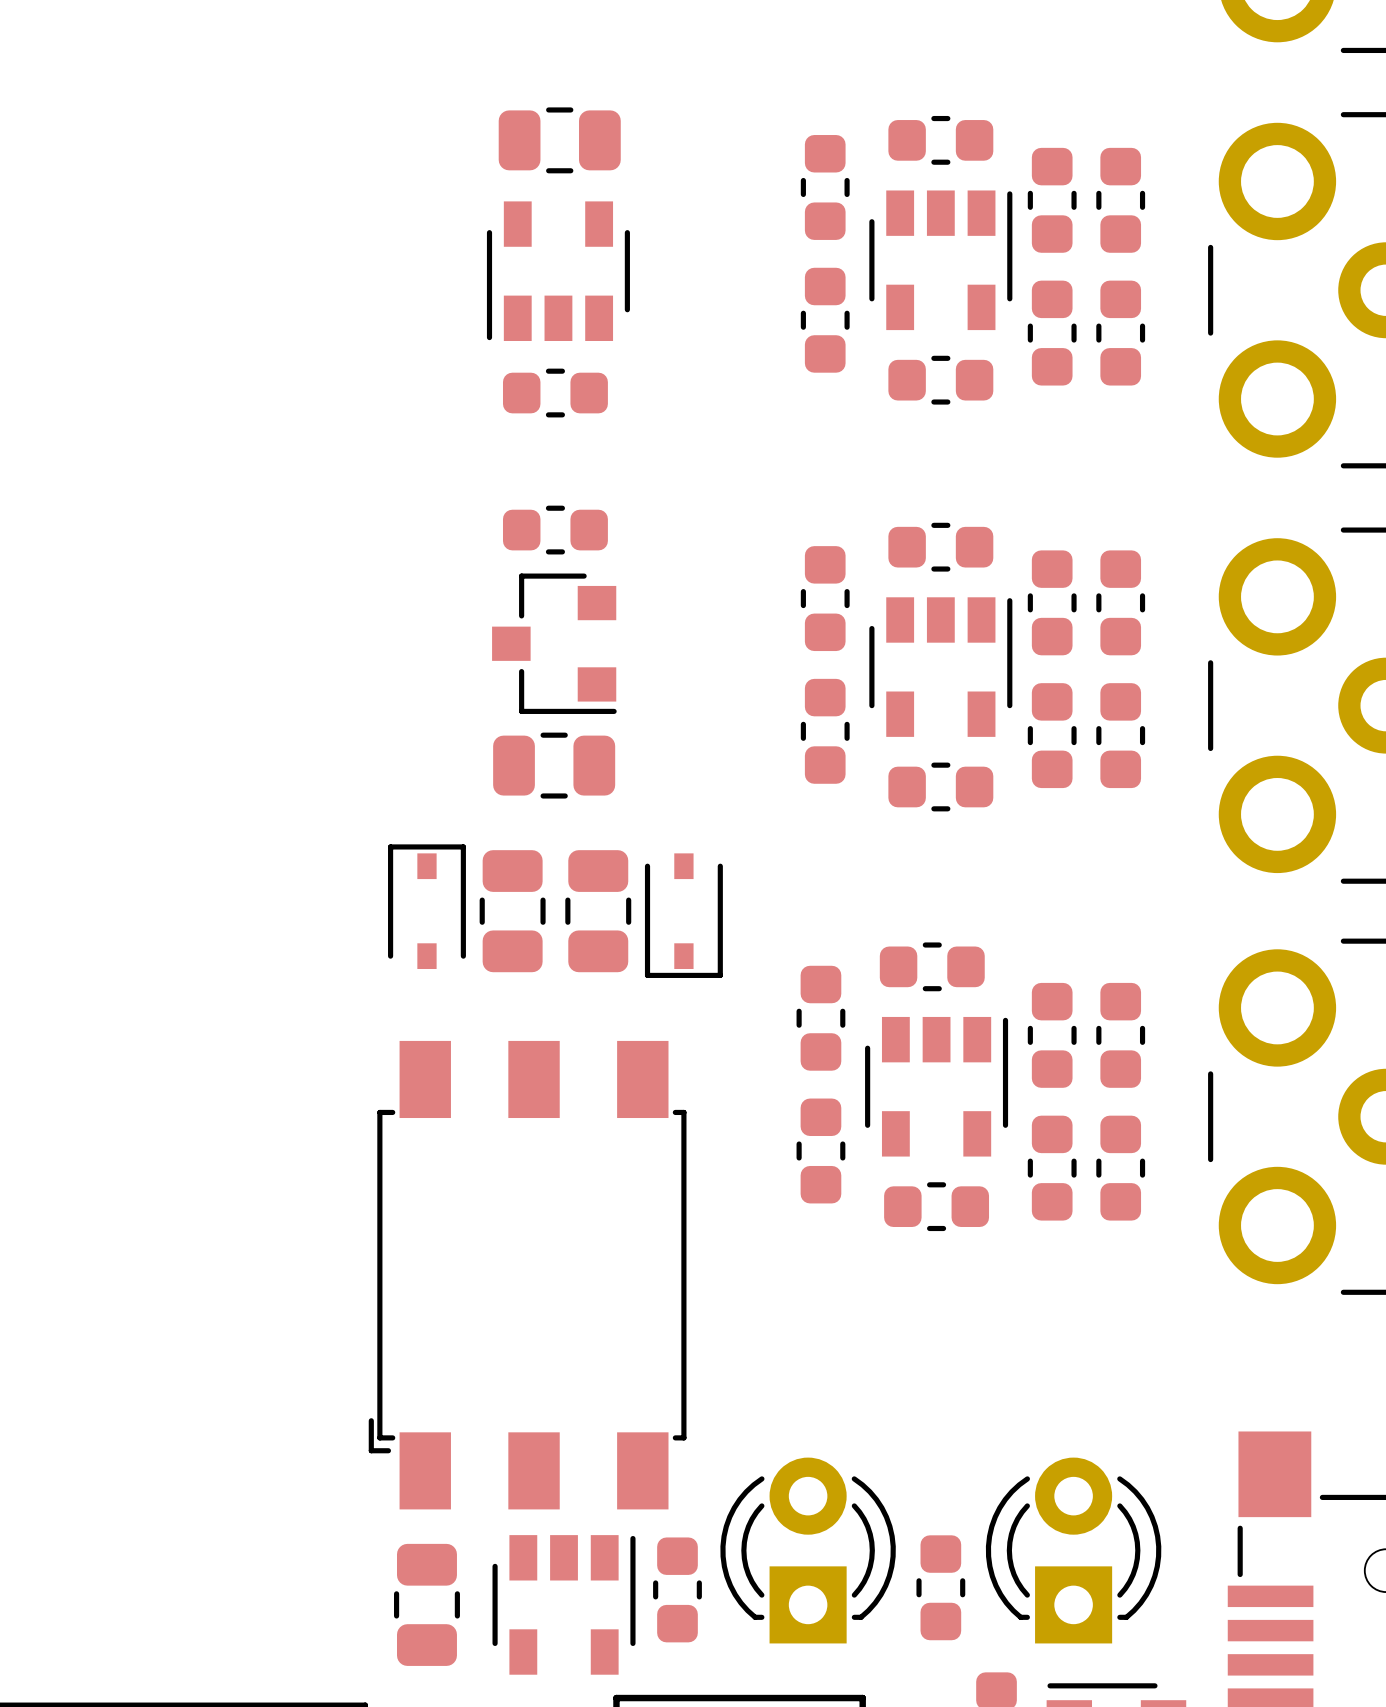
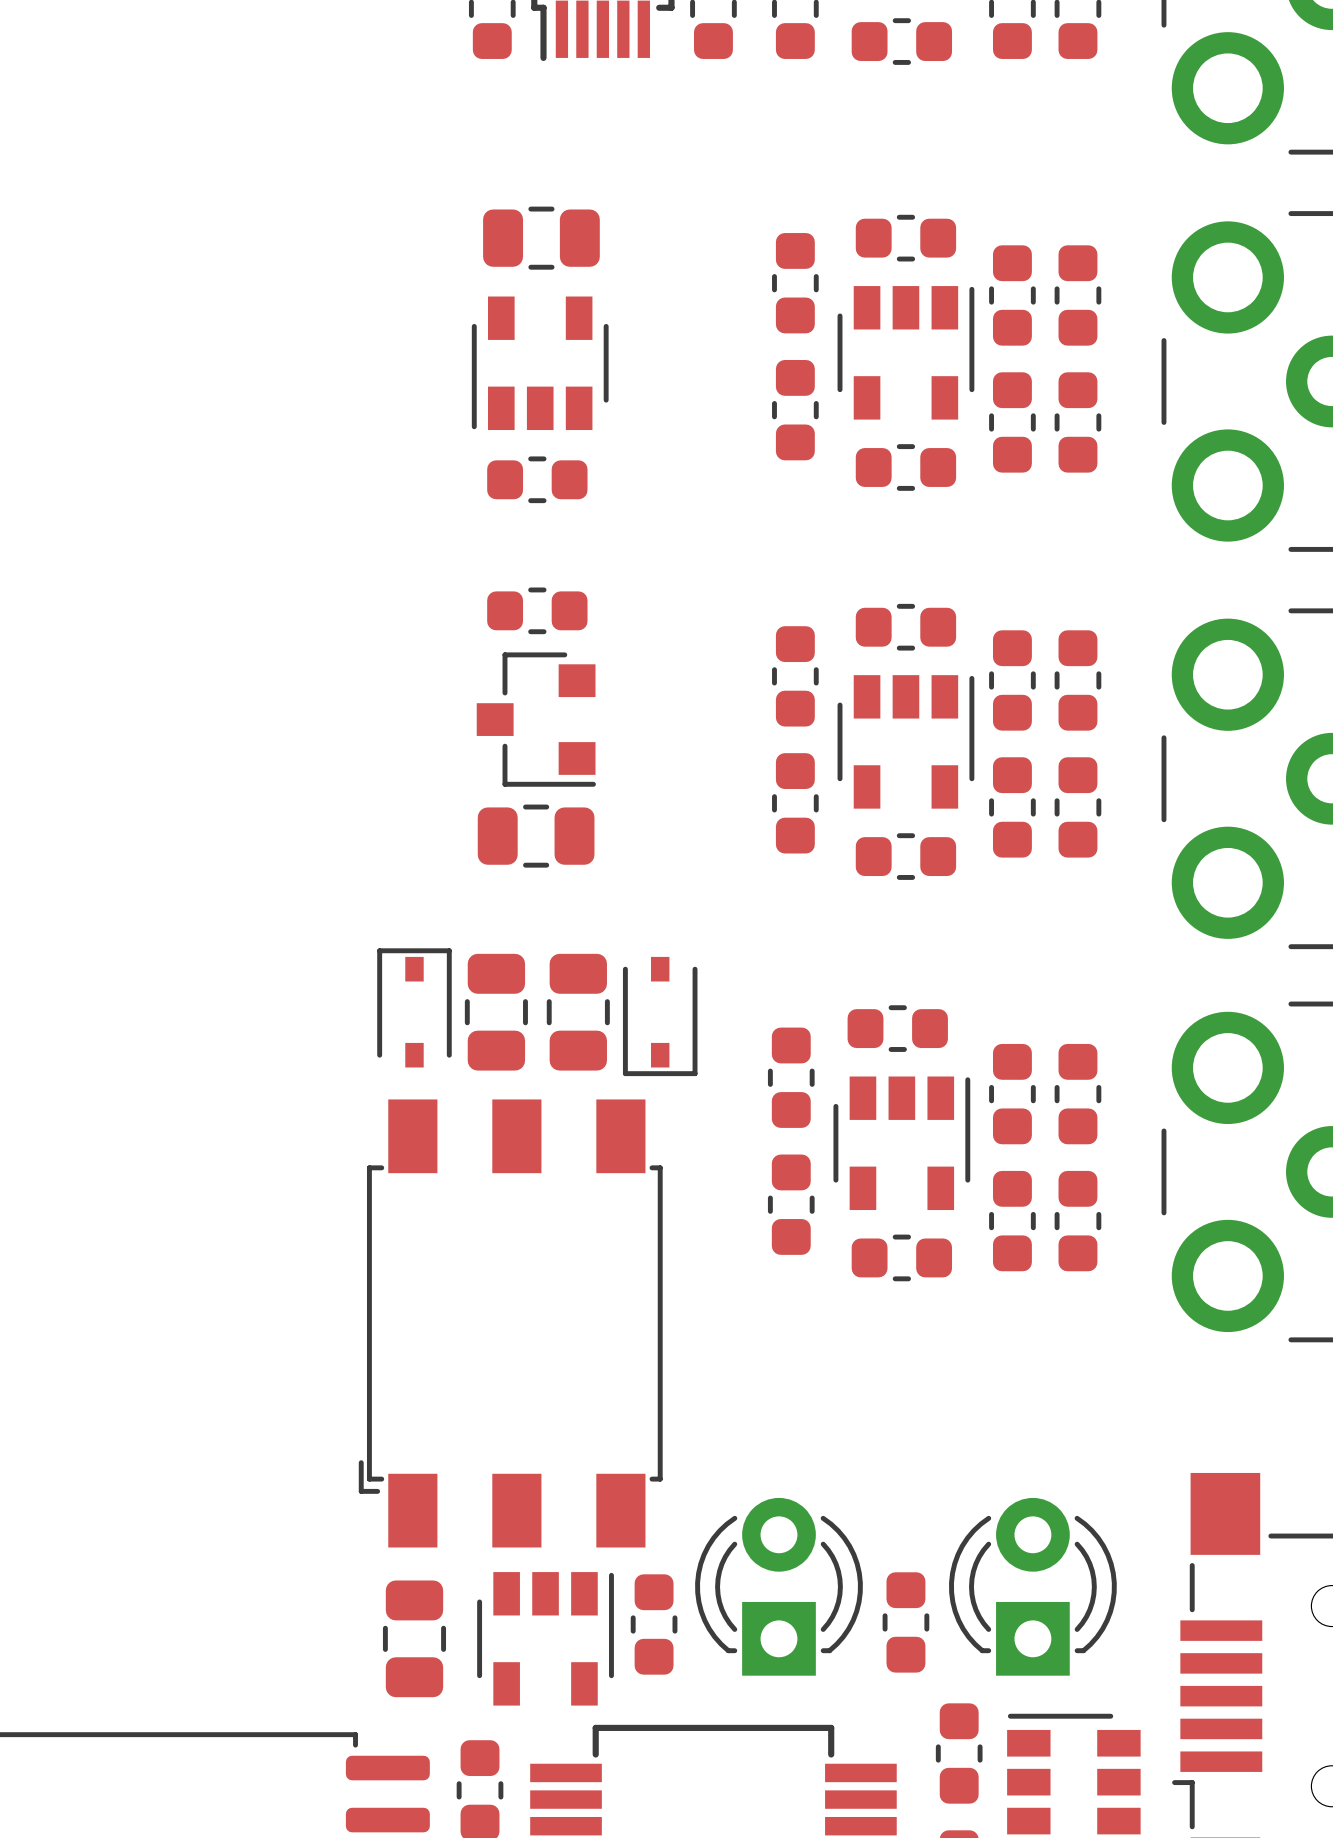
part position: (426, 906) -> (414, 1007)
part position: (512, 911) -> (496, 1012)
part position: (598, 911) -> (578, 1012)
part position: (683, 915) -> (660, 1016)

